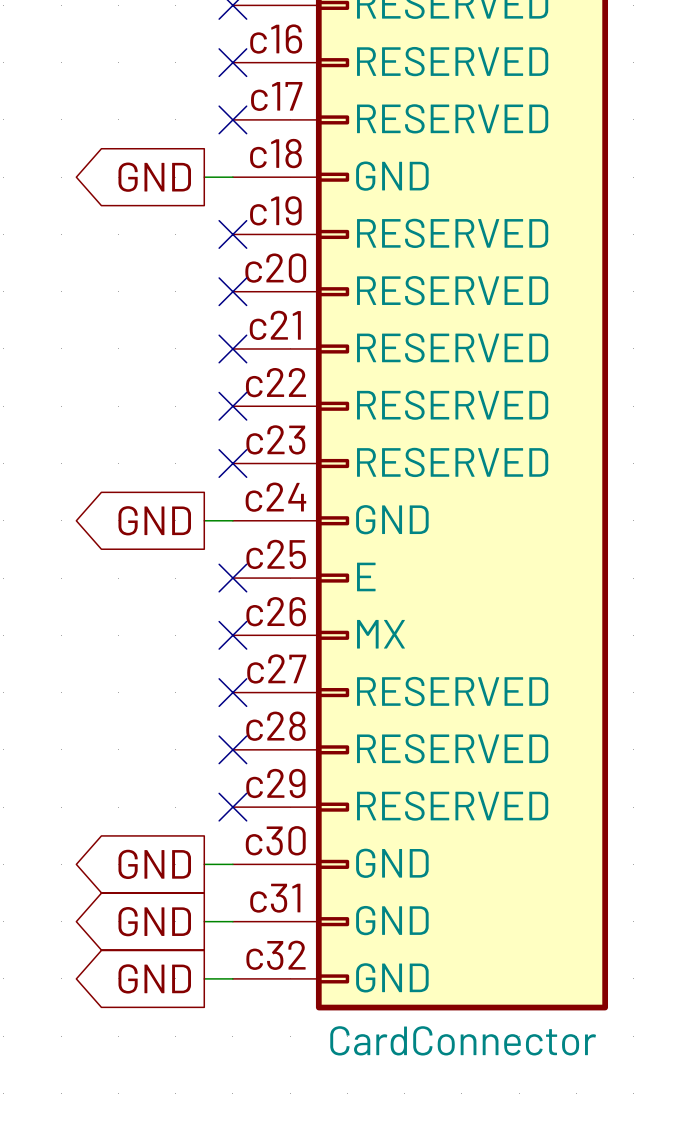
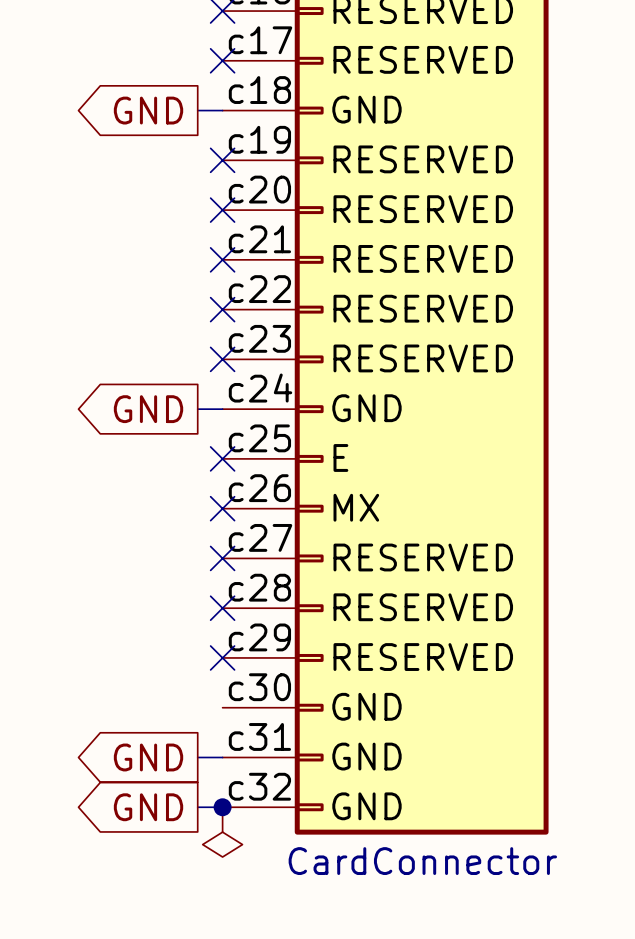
global label: GND (154, 864) -> none
wire: (204, 864) (232, 864) -> none
junction: none -> (222, 807)
power symbol: none -> (222, 832)

